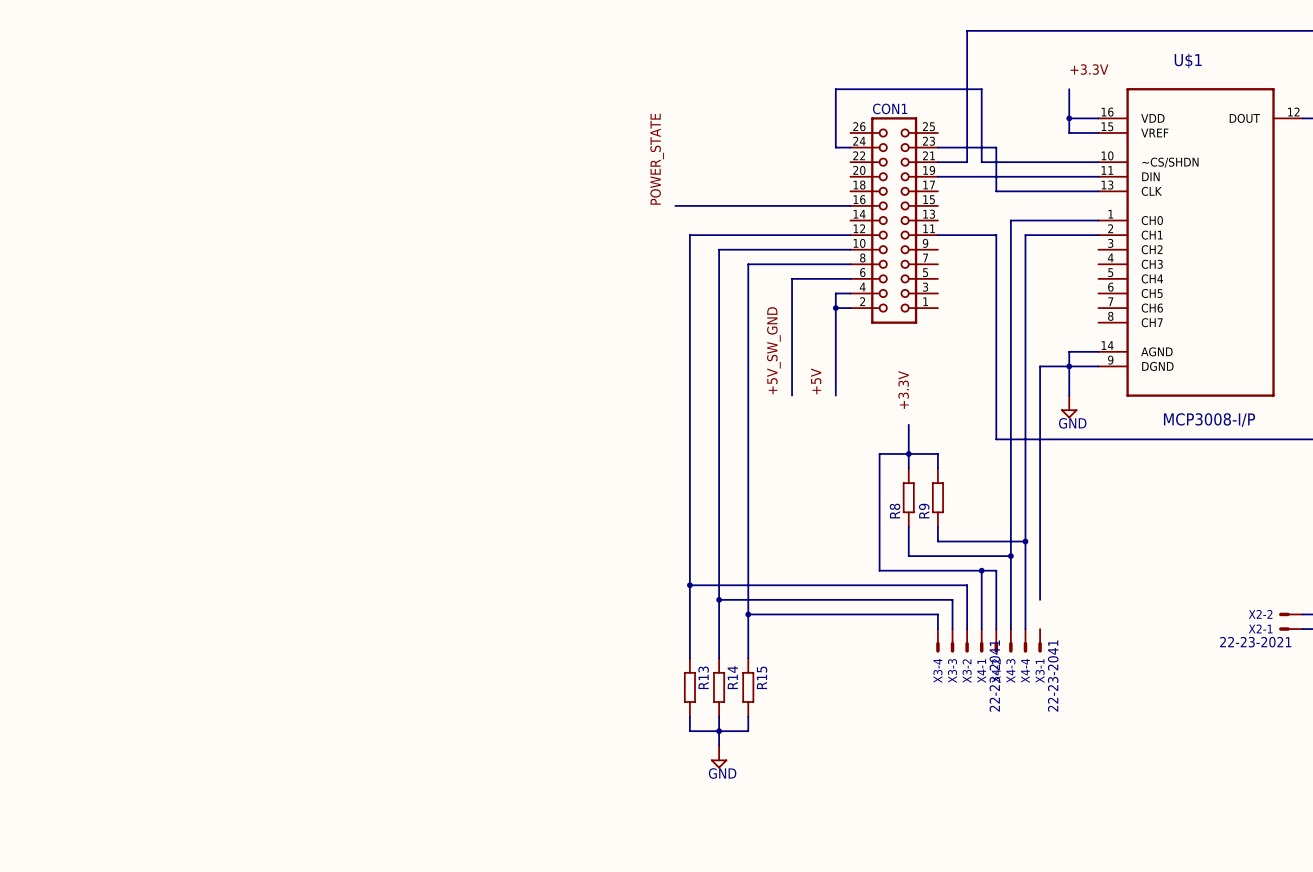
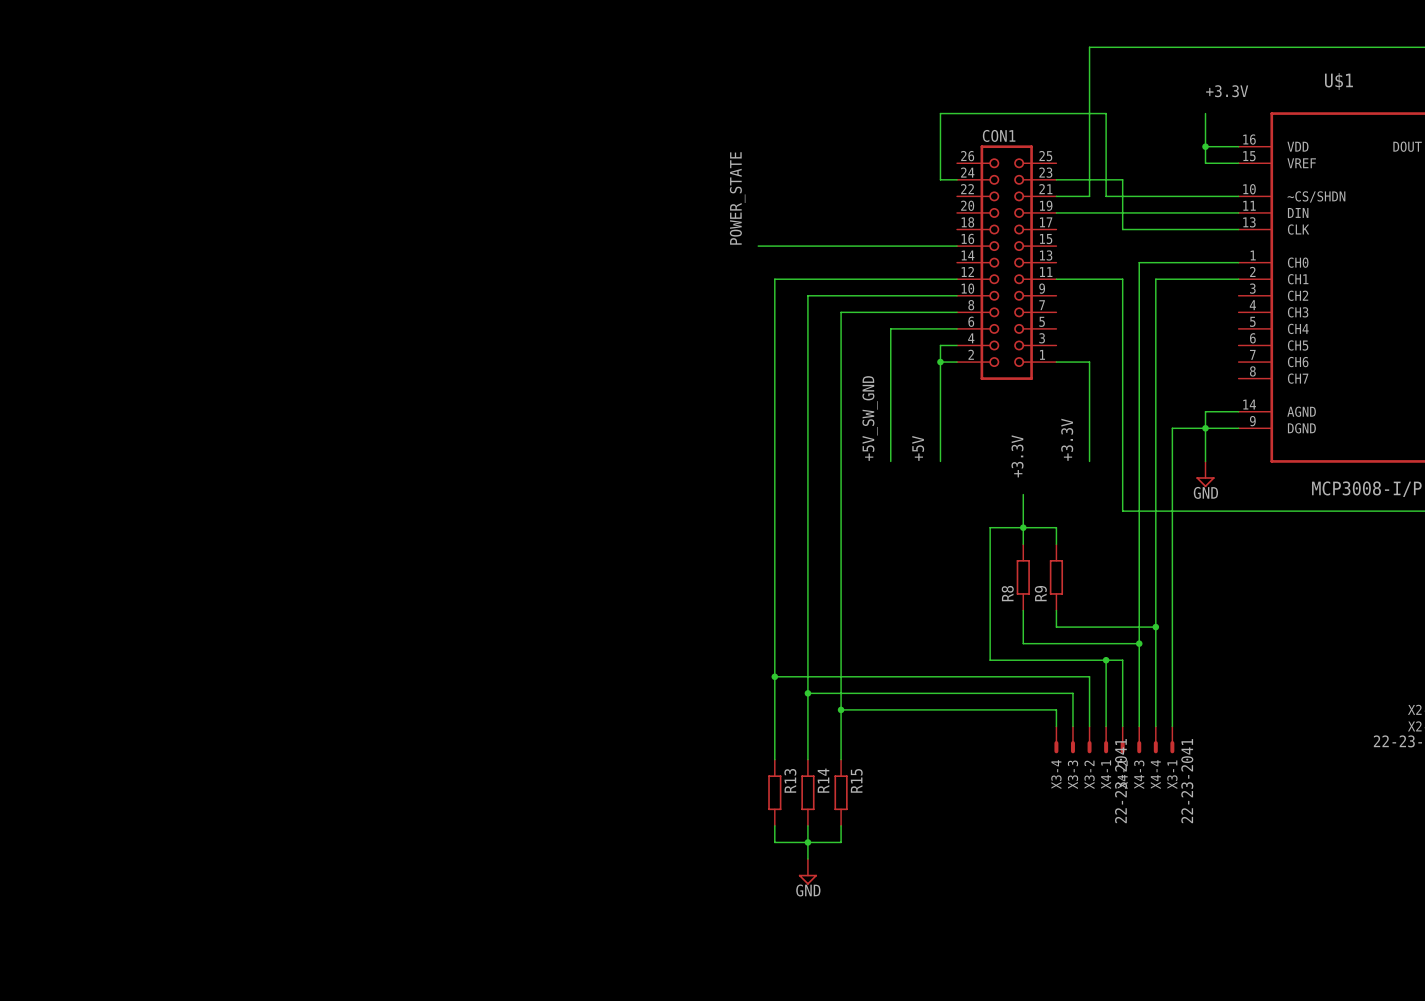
wire: none -> (1056, 362) (1089, 362) (1089, 461)
label: none -> +3.3V (1067, 439)
wire: none -> (1172, 693) (1172, 726)

